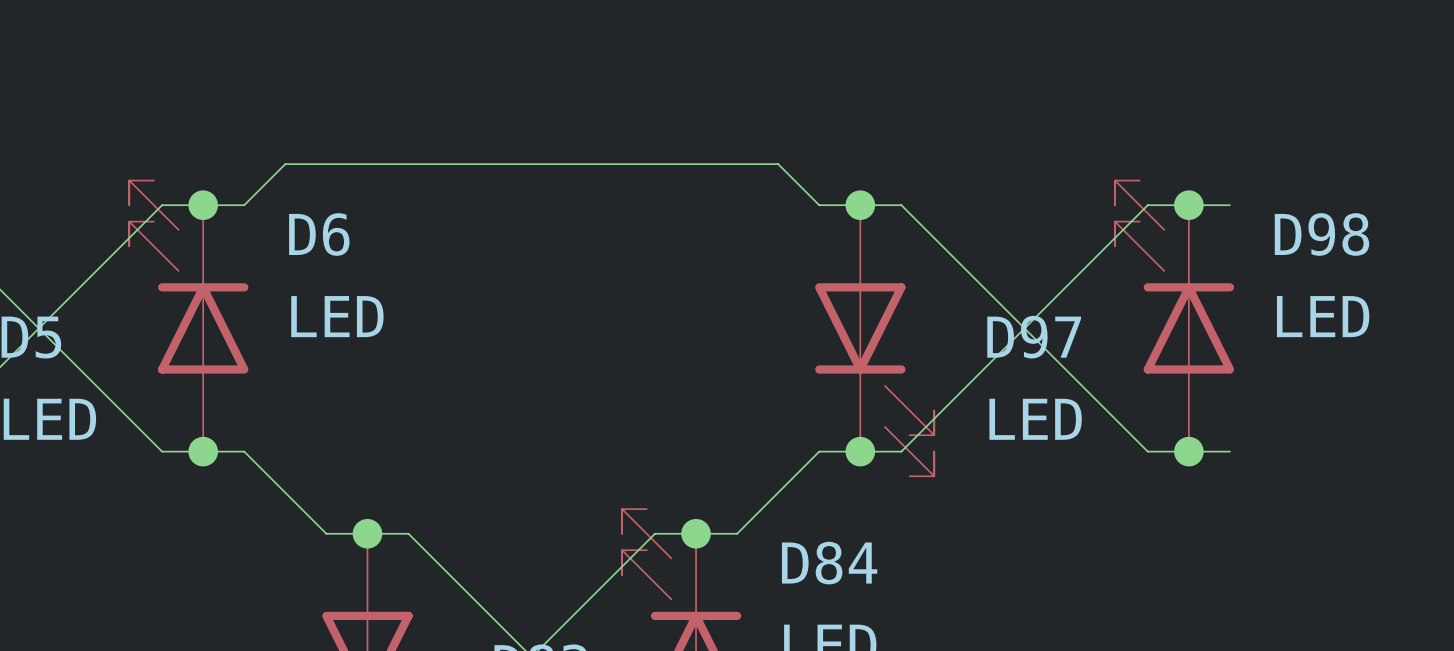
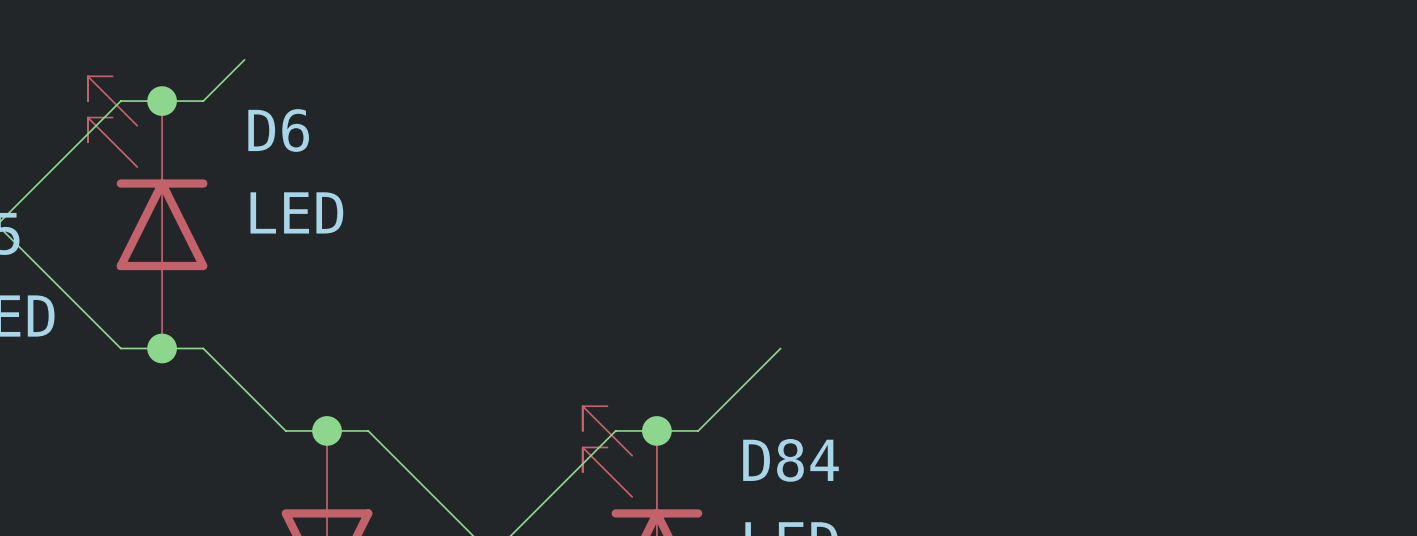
wire: (285, 164) (778, 164) (819, 205) (901, 205) (1147, 451) (1229, 451) -> none
junction: (860, 205) -> none
junction: (1188, 205) -> none
wire: (1229, 205) (1147, 205) (901, 451) (819, 451) -> none
D98: LED (1174, 316) -> none
D97: LED (874, 340) -> none
junction: (860, 451) -> none
junction: (1188, 451) -> none

